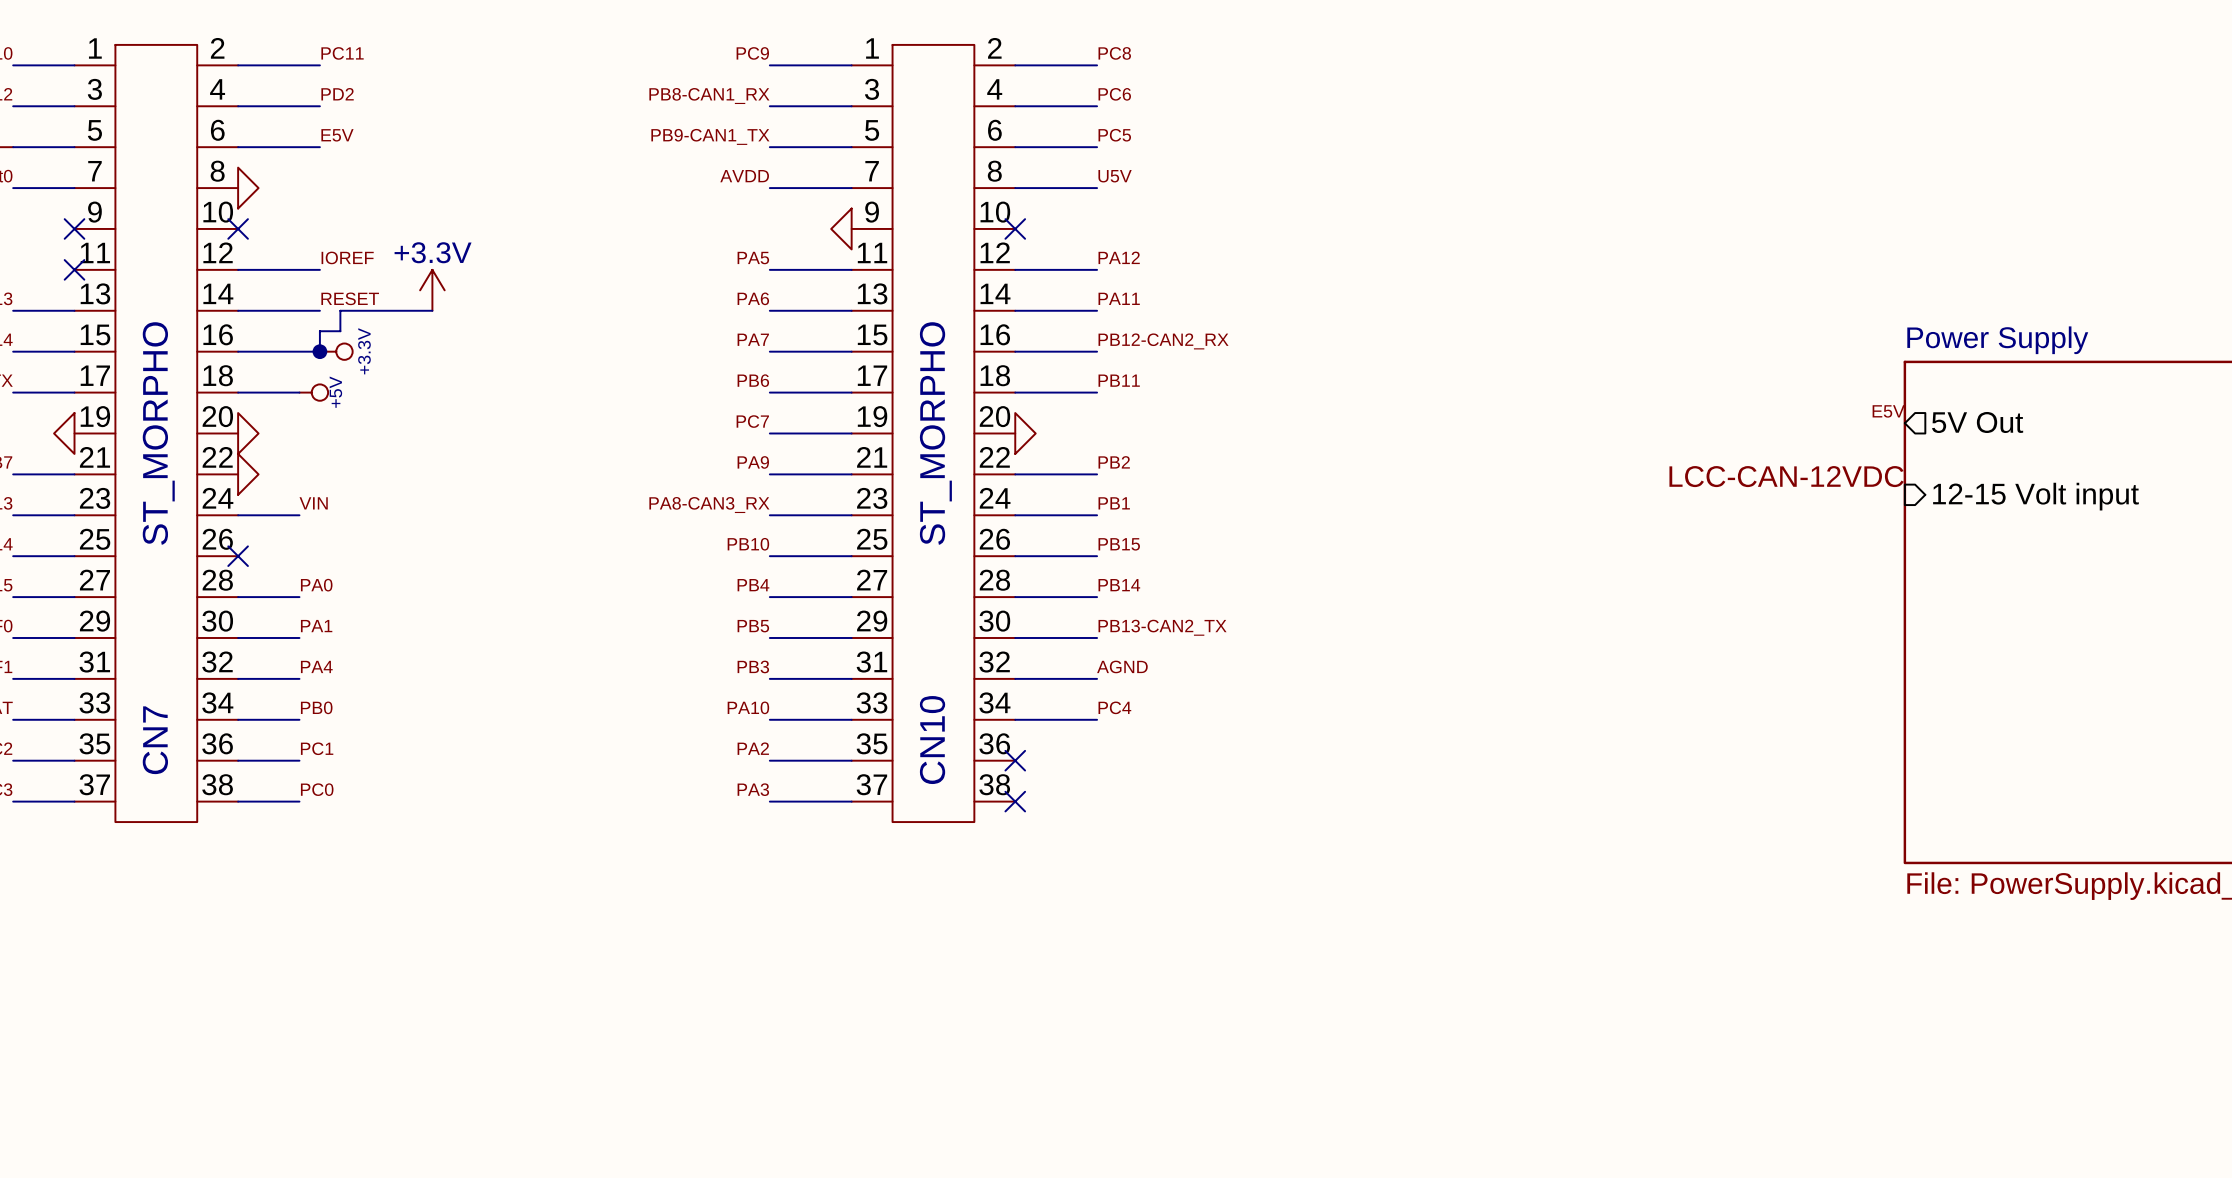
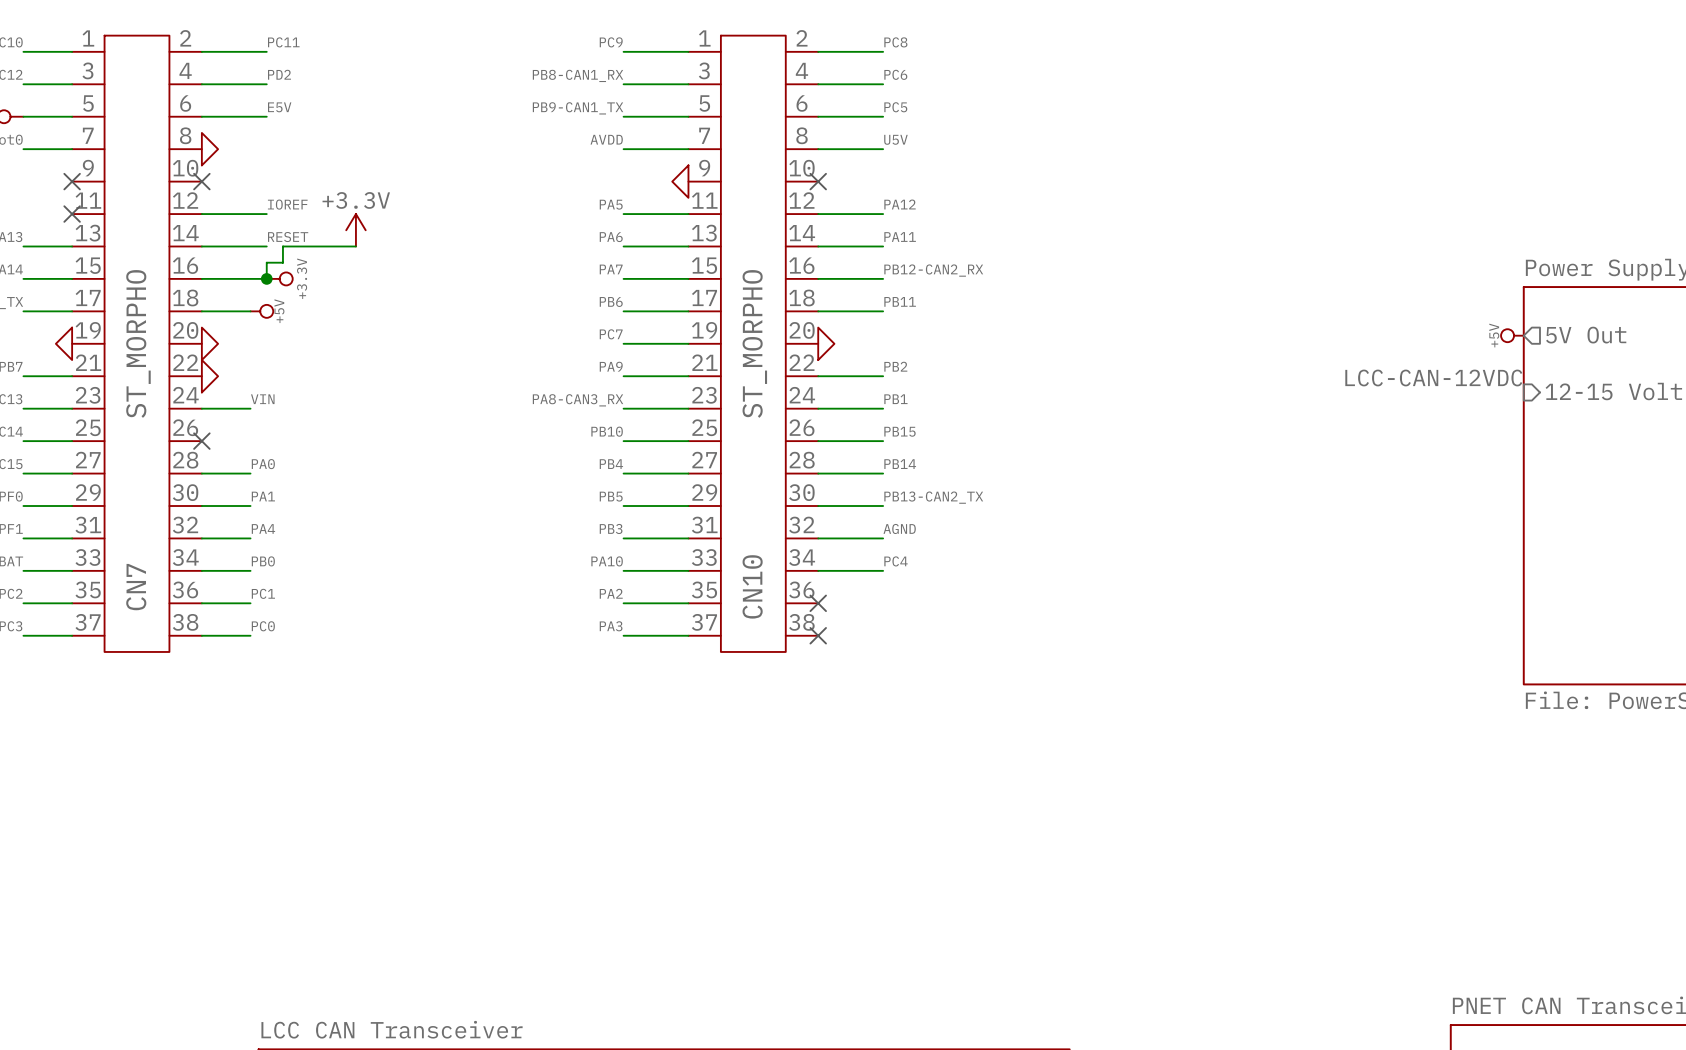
label: E5V (1888, 411) -> none
power symbol: none -> +5V (1512, 335)

